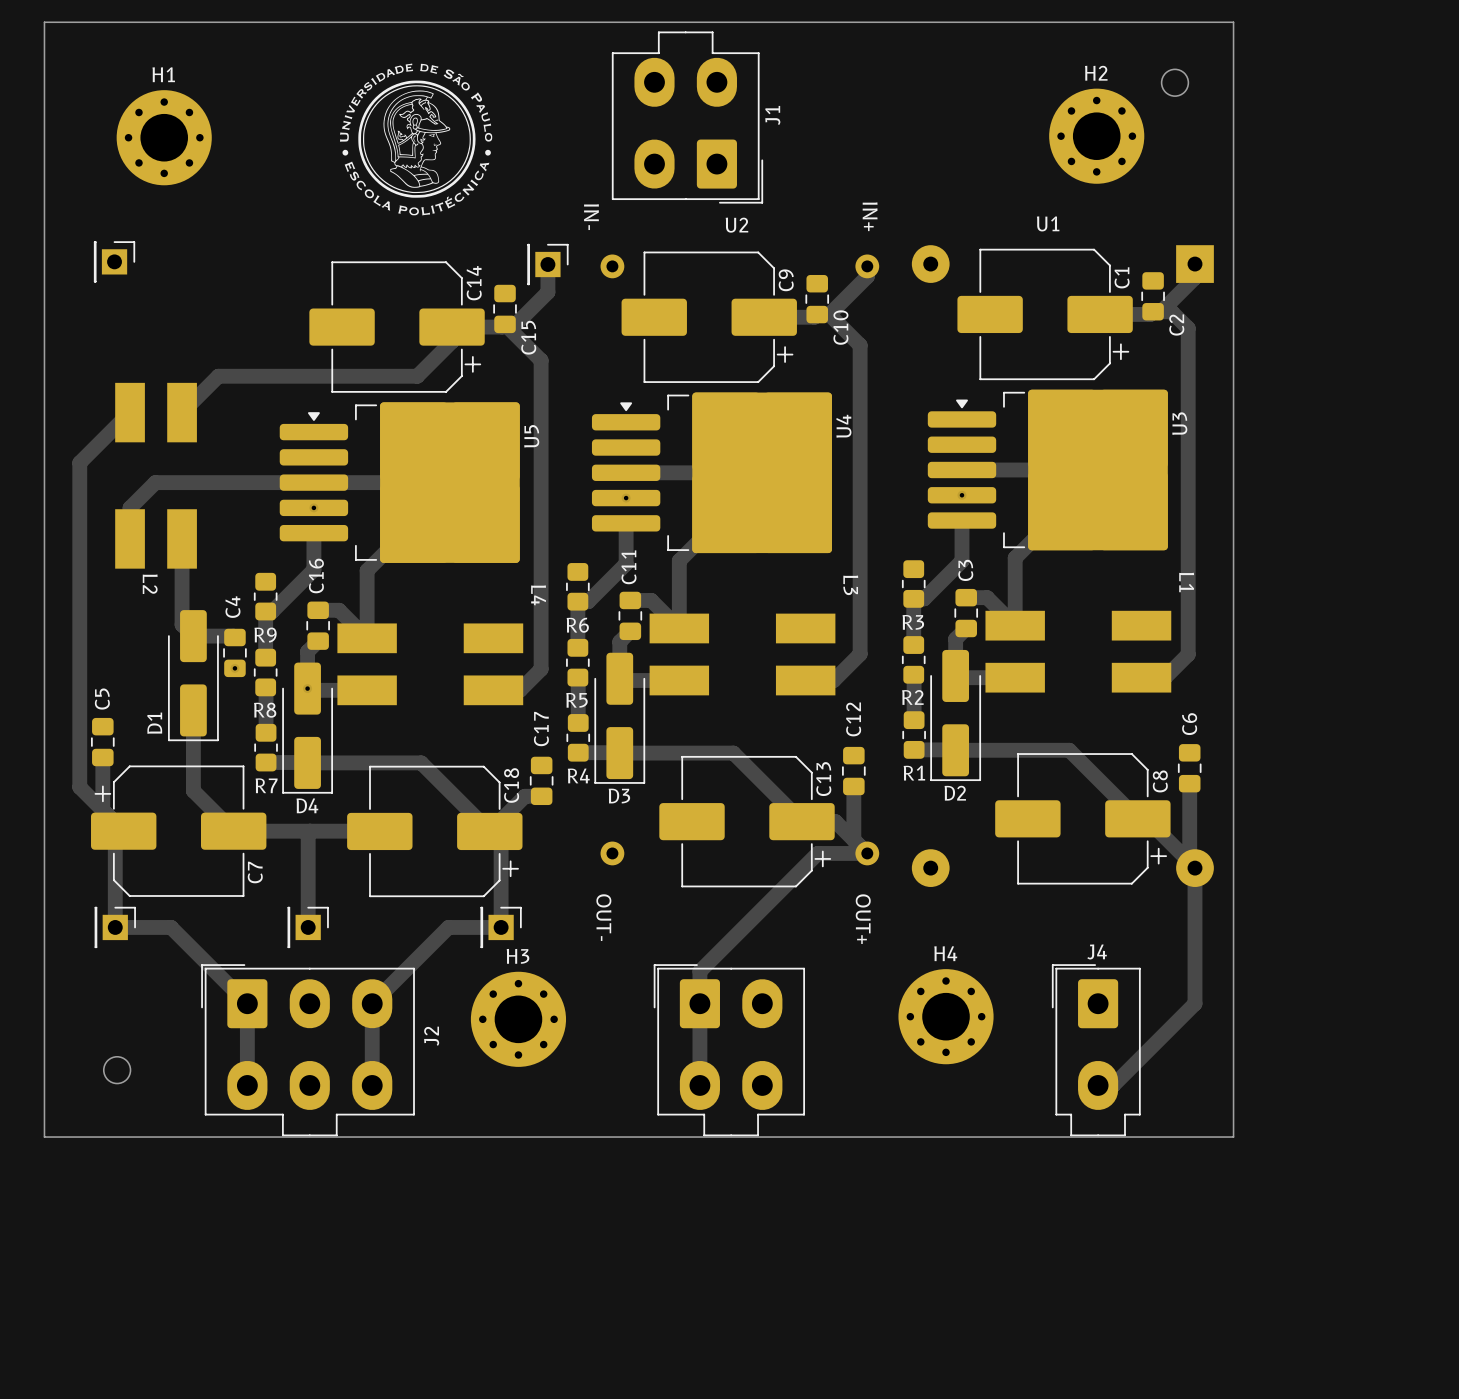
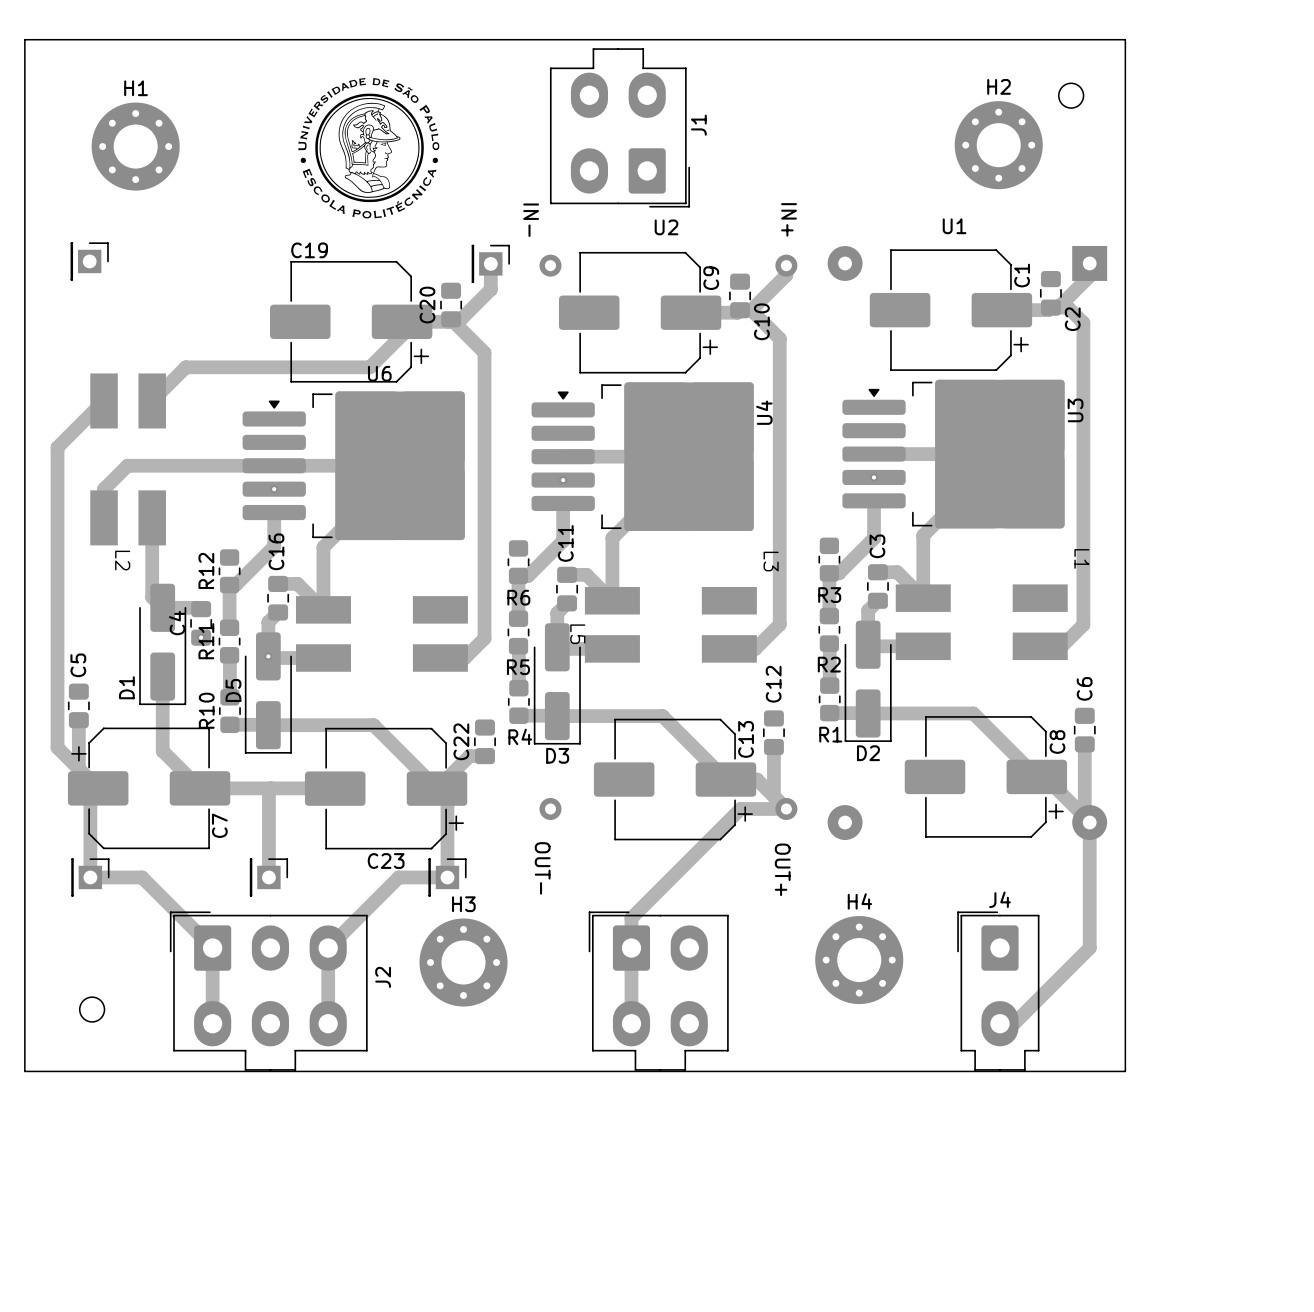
C14 name: C14 (474, 283) -> C19 (309, 250)
C15 name: C15 (528, 337) -> C20 (427, 305)
U5 name: U5 (531, 436) -> U6 (379, 373)
L4 name: L4 (538, 595) -> L5 (577, 634)
C4 name position: C4 (232, 607) -> C4 (177, 623)
R9 name: R9 (265, 635) -> R12 (206, 570)
R8 name: R8 (265, 710) -> R11 (206, 641)
C17 name: C17 (541, 729) -> C22 (461, 741)
R7 name: R7 (266, 785) -> R10 (206, 710)
C18 name: C18 (511, 785) -> C23 (386, 861)
D4 name: D4 (307, 805) -> D5 (233, 690)

